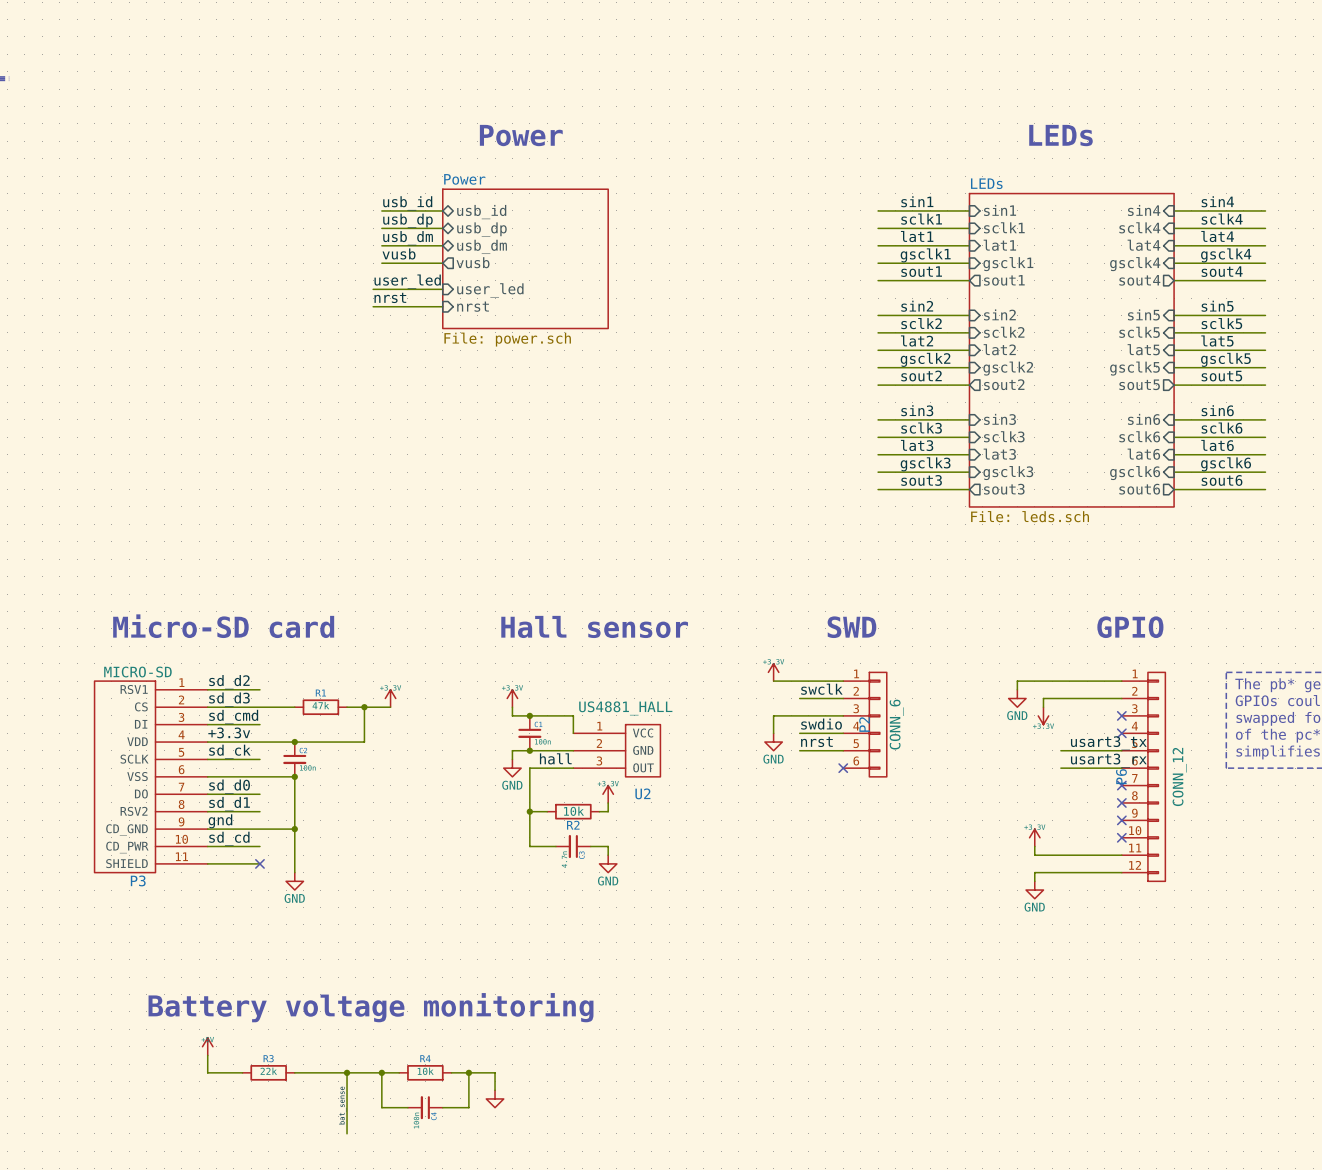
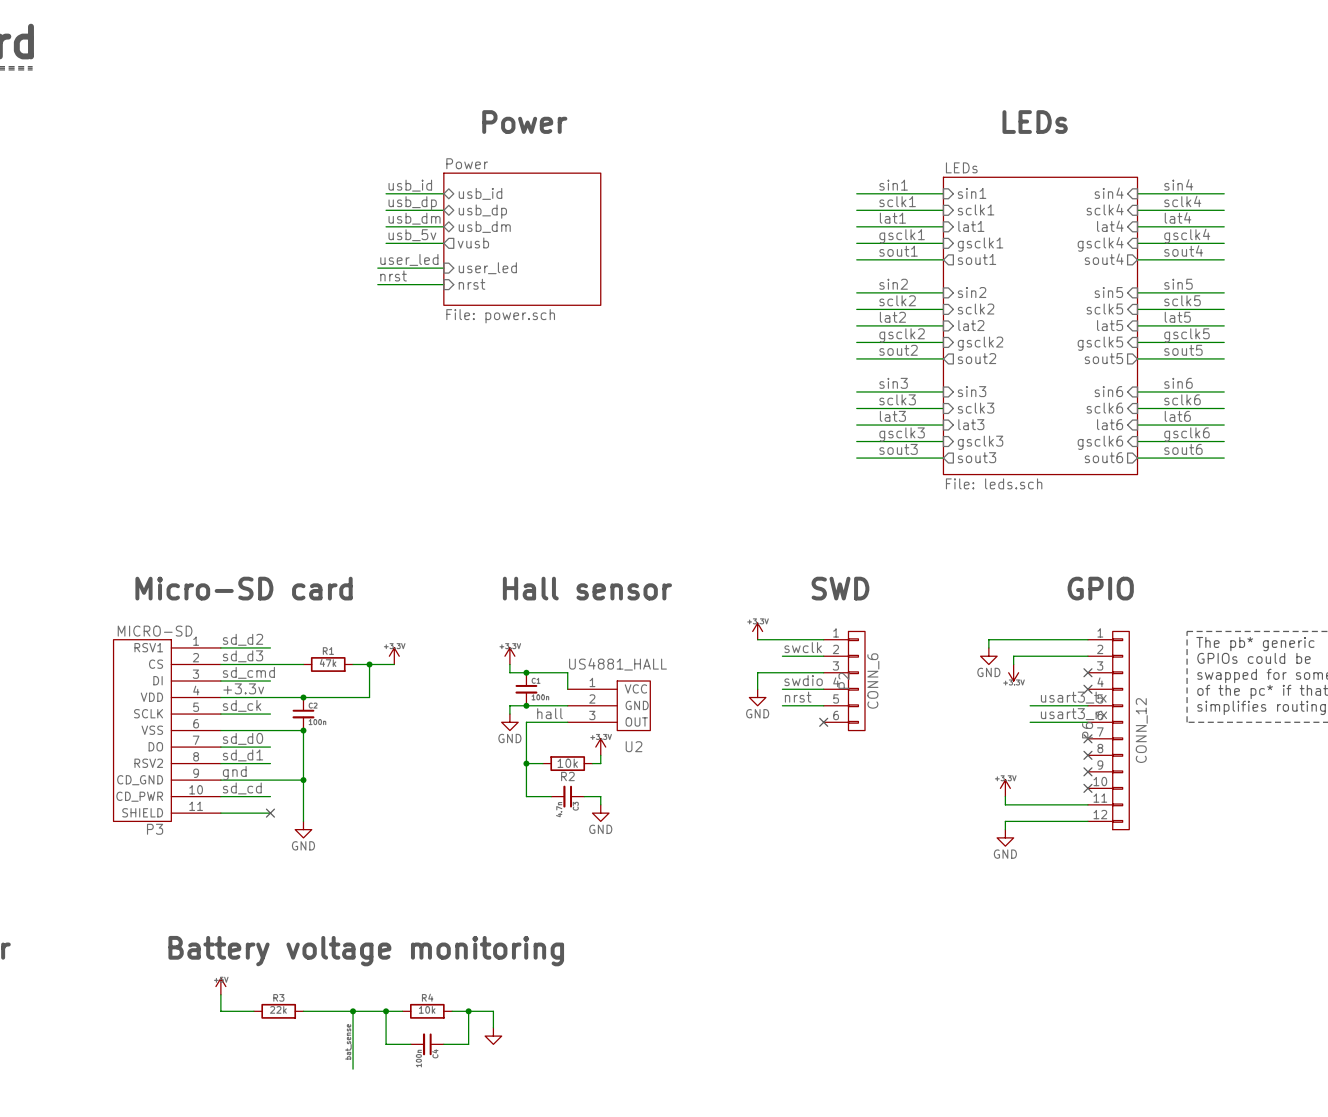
label: vusb (399, 253) -> usb_5v (412, 235)

